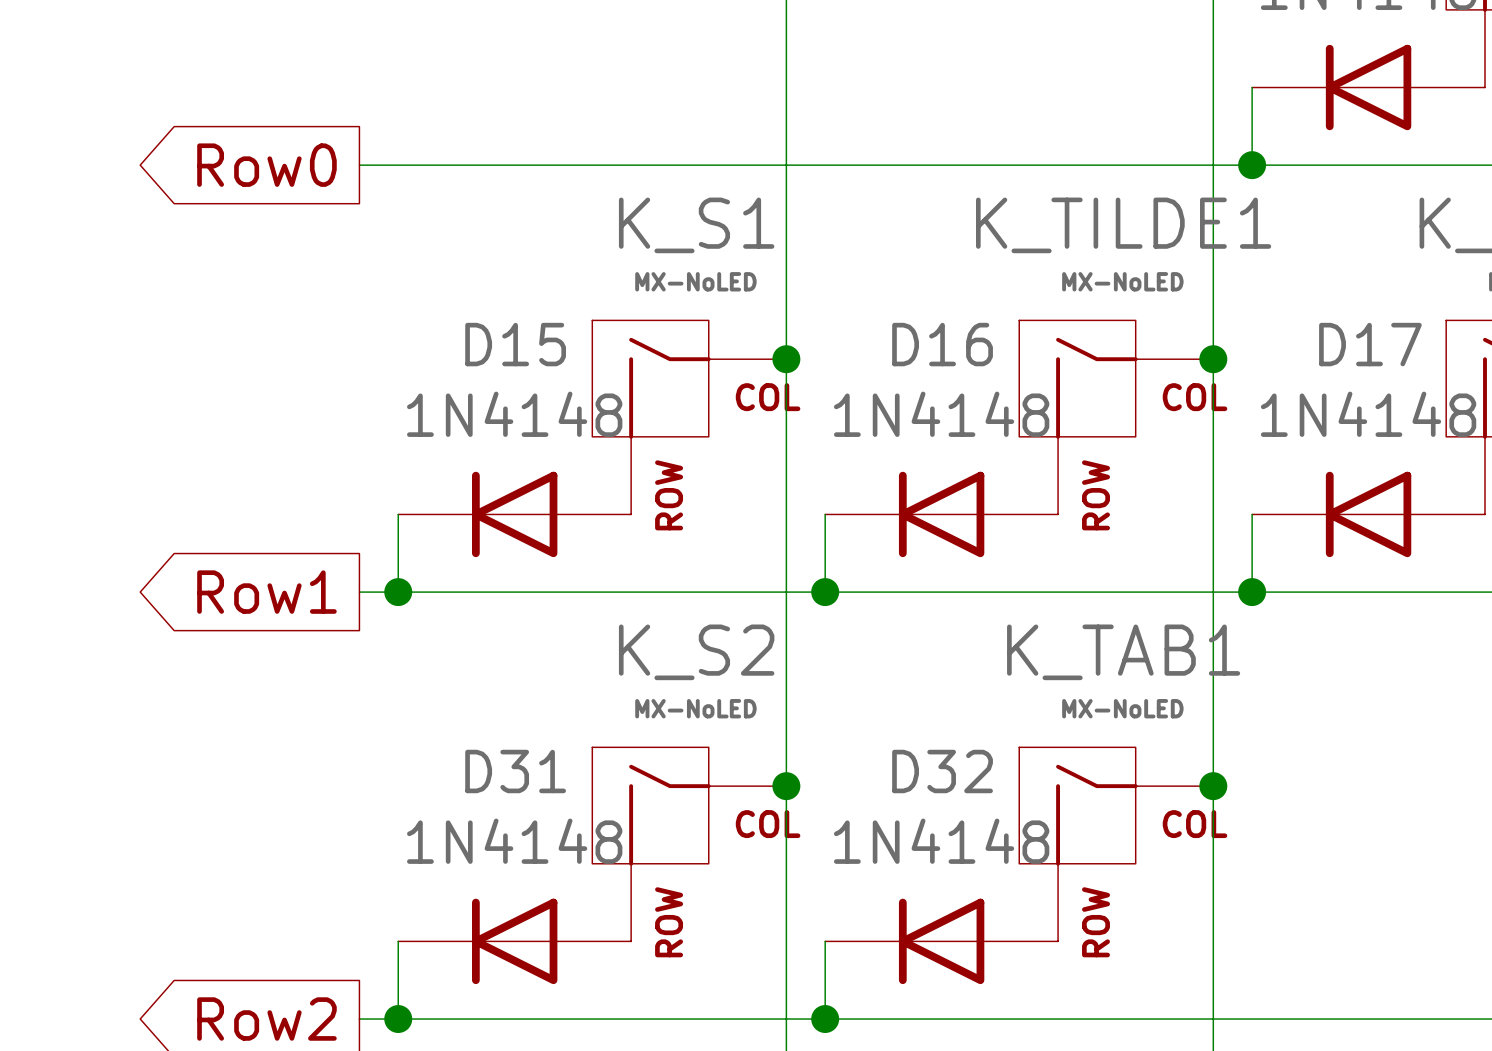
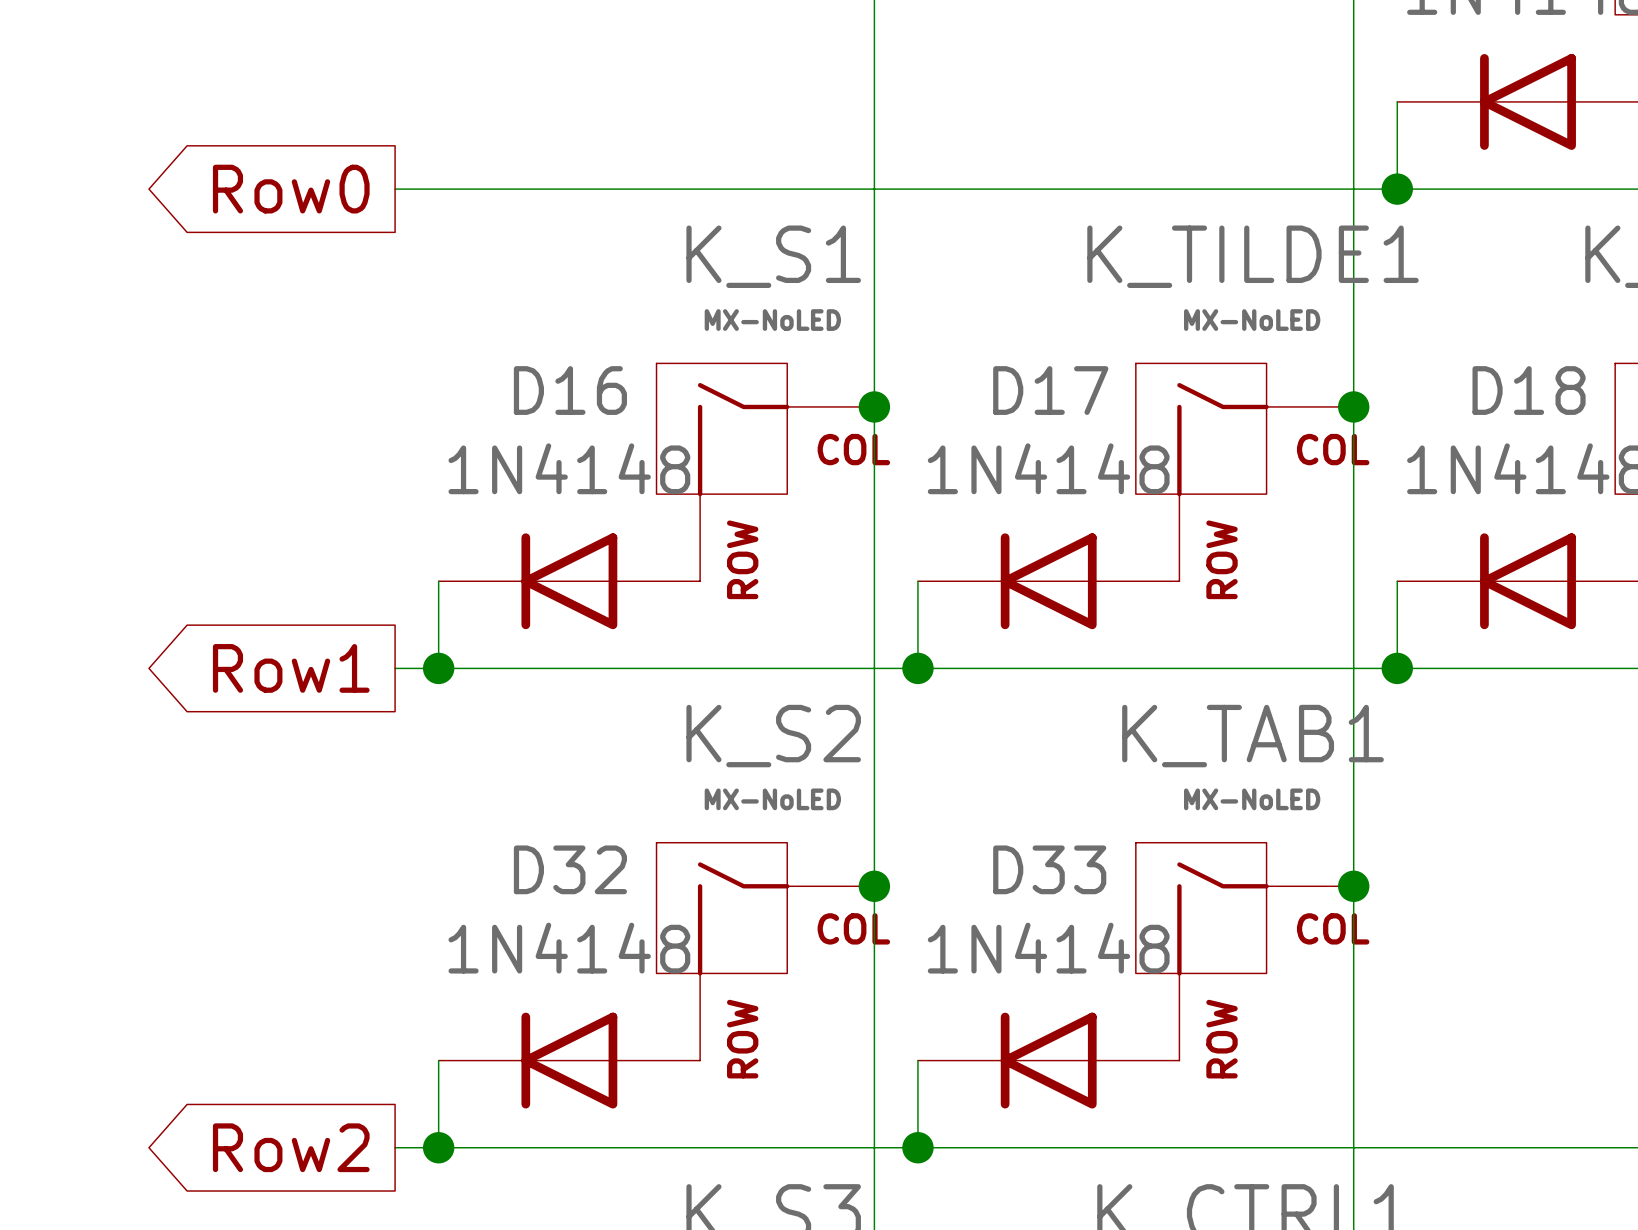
D15 name: D15 (515, 344) -> D16 (570, 390)
D16 name: D16 (942, 344) -> D17 (1050, 390)
D17 name: D17 (1370, 344) -> D18 (1529, 390)
D31 name: D31 (515, 771) -> D32 (570, 869)
D32 name: D32 (942, 771) -> D33 (1049, 869)

